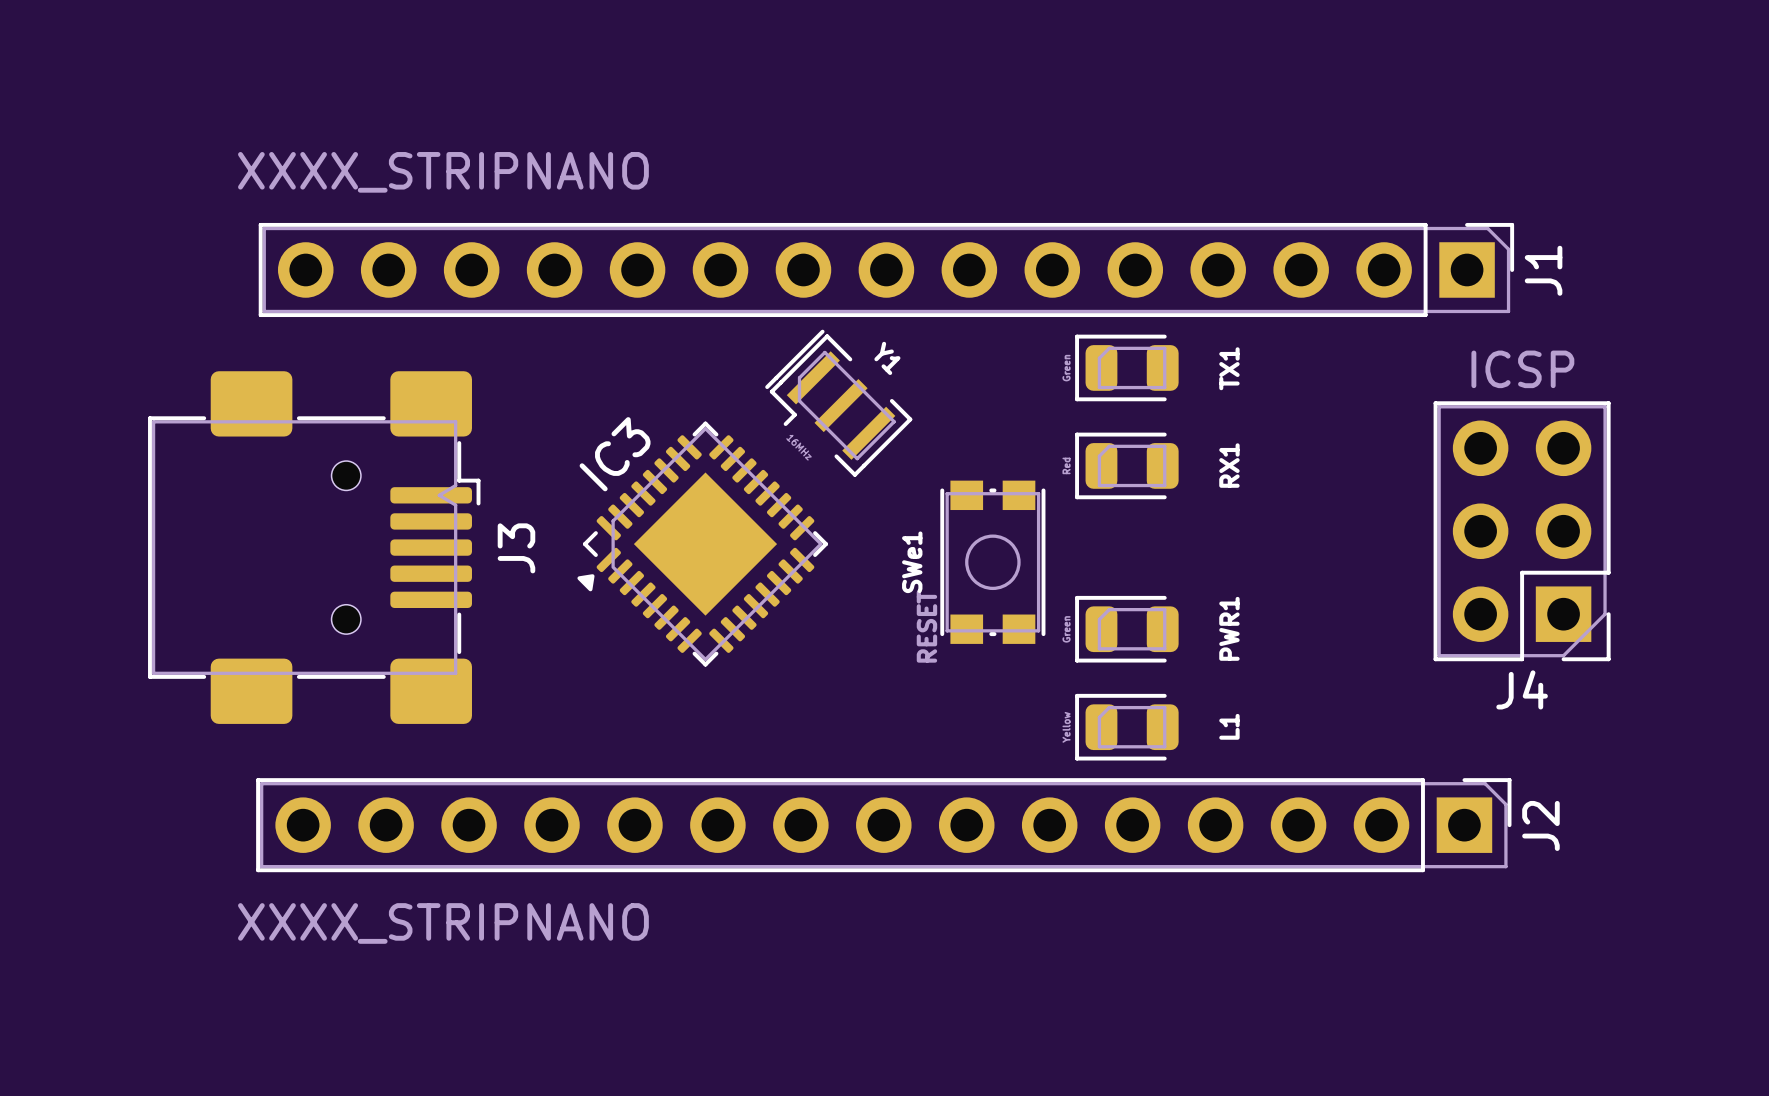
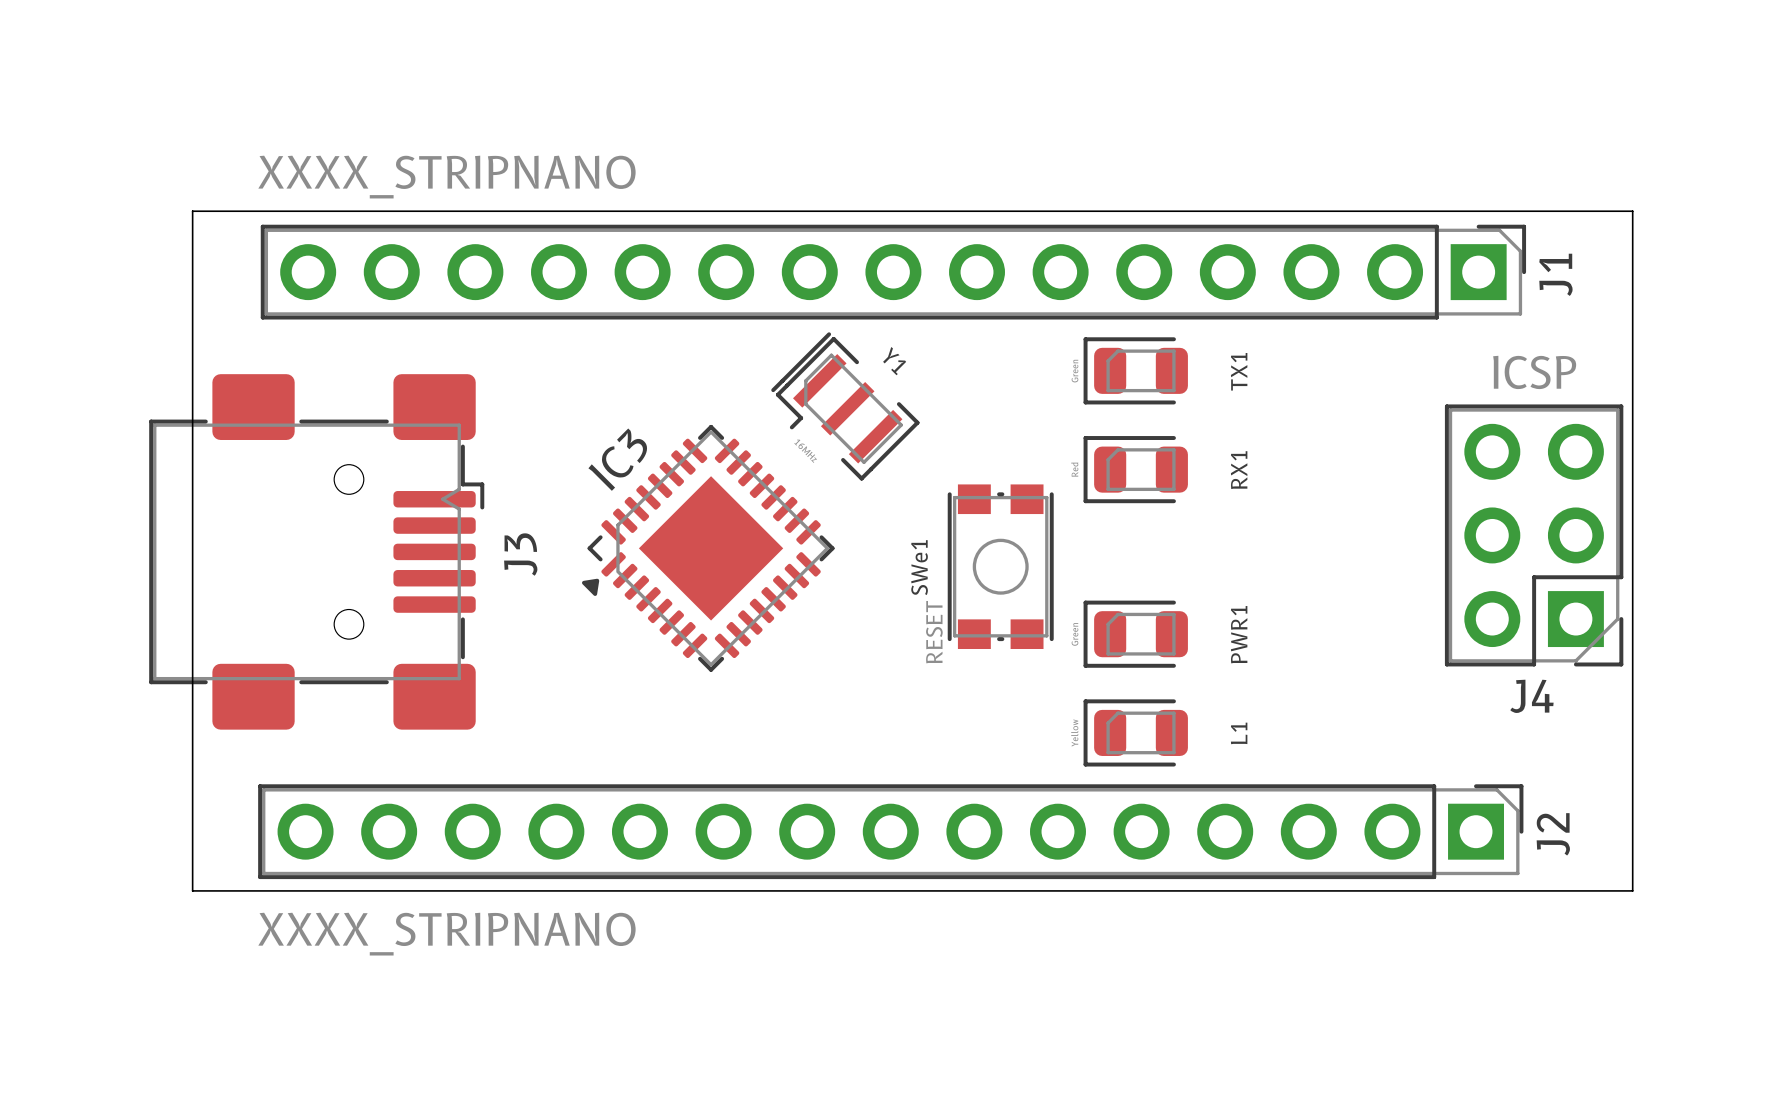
board edge: none -> (192, 211) (1632, 211) (1632, 890) (192, 890) (192, 211)

